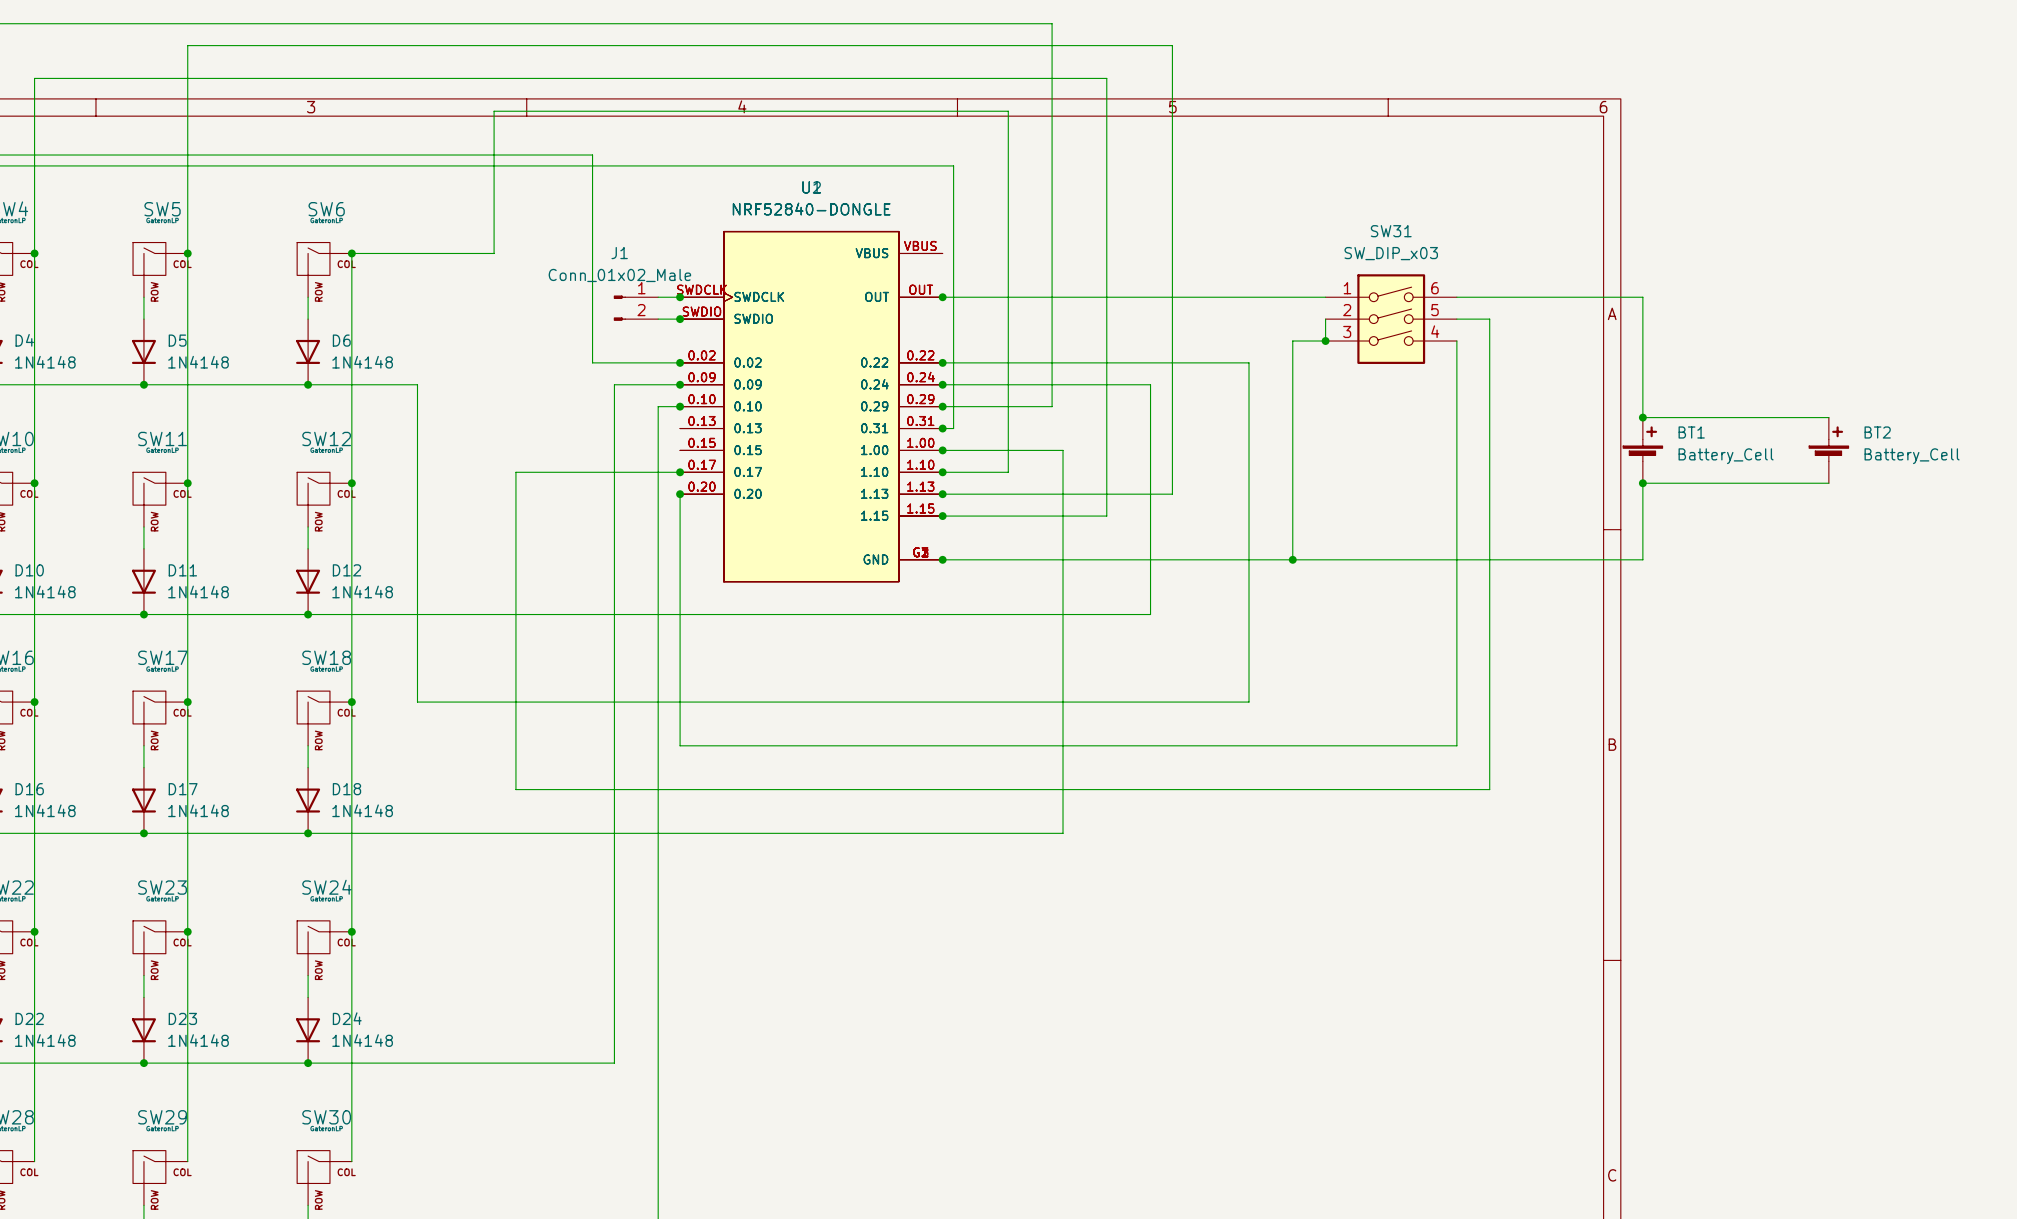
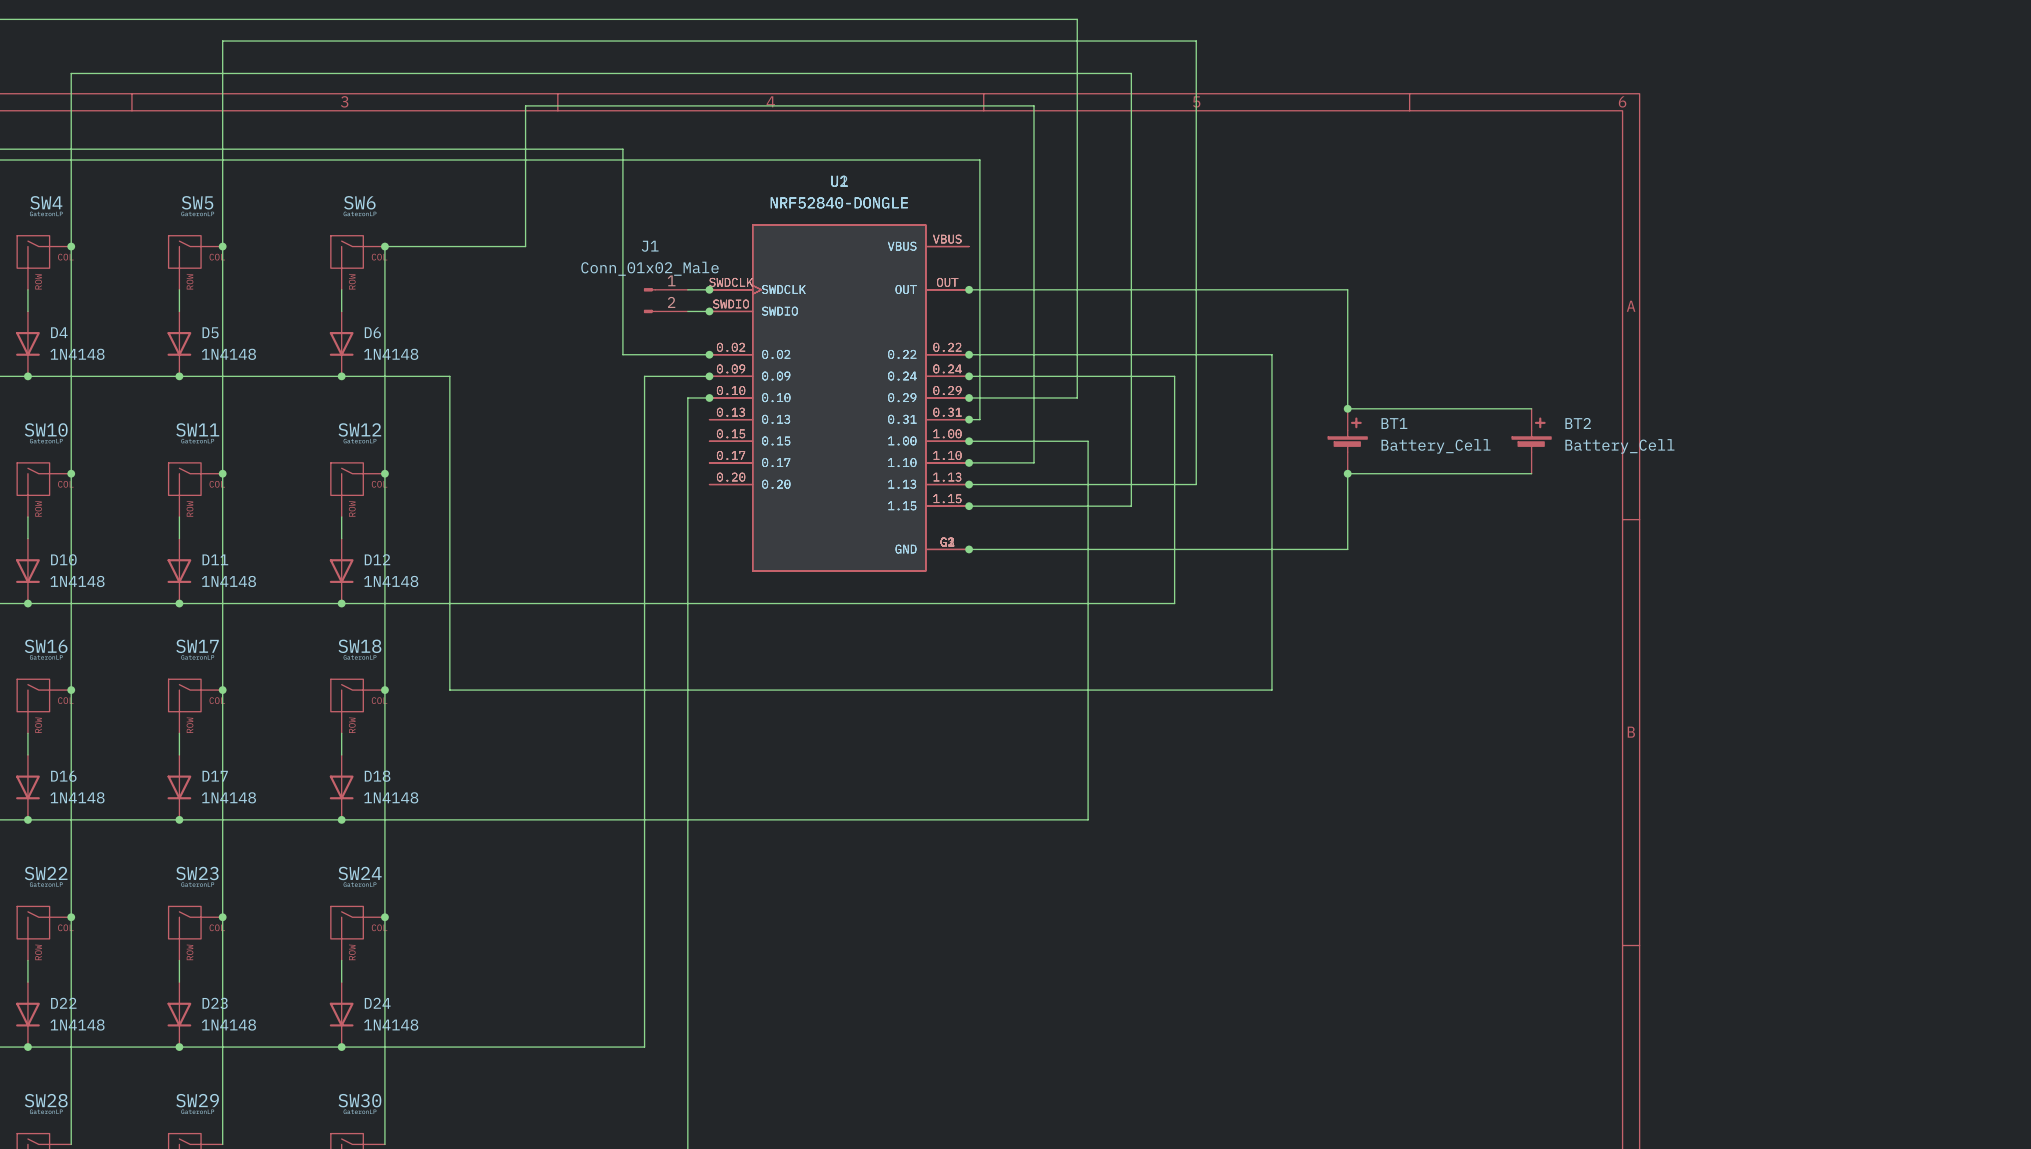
wire: none -> (1347, 289) (1347, 311)
wire: (1456, 297) (1642, 297) (1642, 417) (1828, 417) -> none
SW31: SW_DIP_x03 (1391, 319) -> none
wire: (1456, 319) (1489, 319) (1489, 789) (515, 789) (515, 472) (680, 472) -> none
wire: (1325, 341) (1292, 341) (1292, 559) -> (1347, 333) (1347, 408) (1531, 408)
junction: (1325, 341) -> none
wire: (1456, 341) (1456, 745) (680, 745) (680, 494) -> none
junction: none -> (1347, 408)
junction: (1642, 417) -> none
BT1 position: (1642, 450) -> (1347, 441)
BT2 position: (1828, 450) -> (1531, 441)
junction: (680, 472) -> none
junction: none -> (1347, 473)
junction: (1642, 483) -> none
wire: (1828, 483) (1642, 483) (1642, 559) (1325, 559) -> (1531, 473) (1347, 473) (1347, 549)
junction: (680, 494) -> none
junction: (1292, 559) -> none

